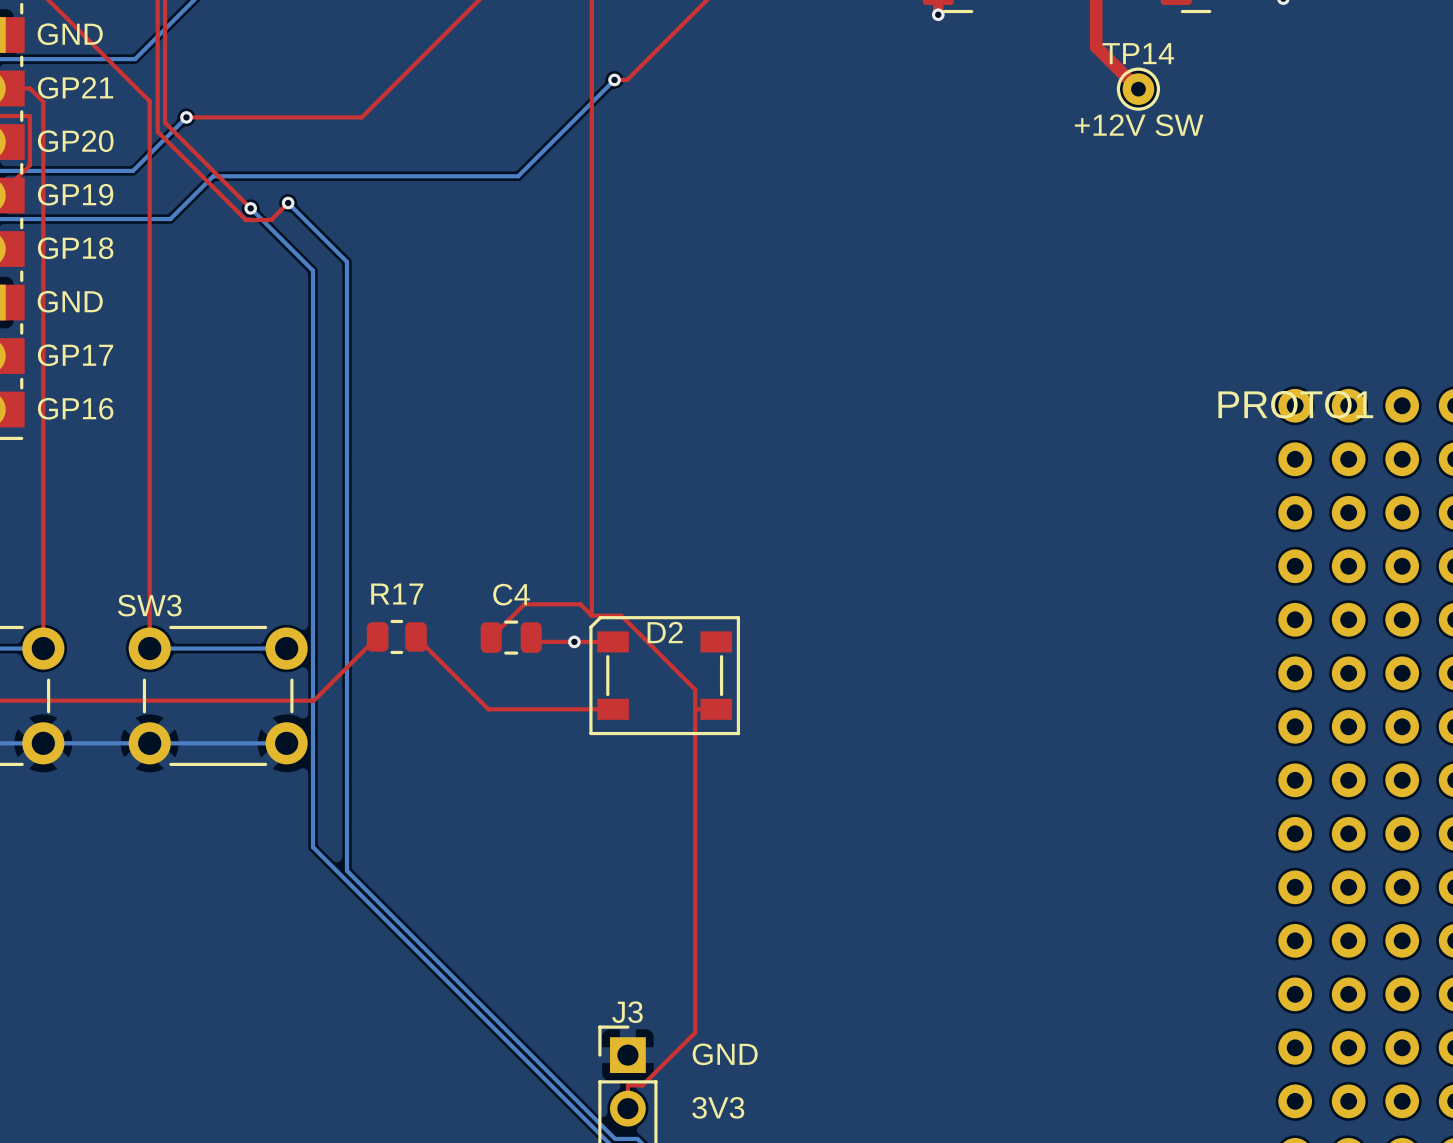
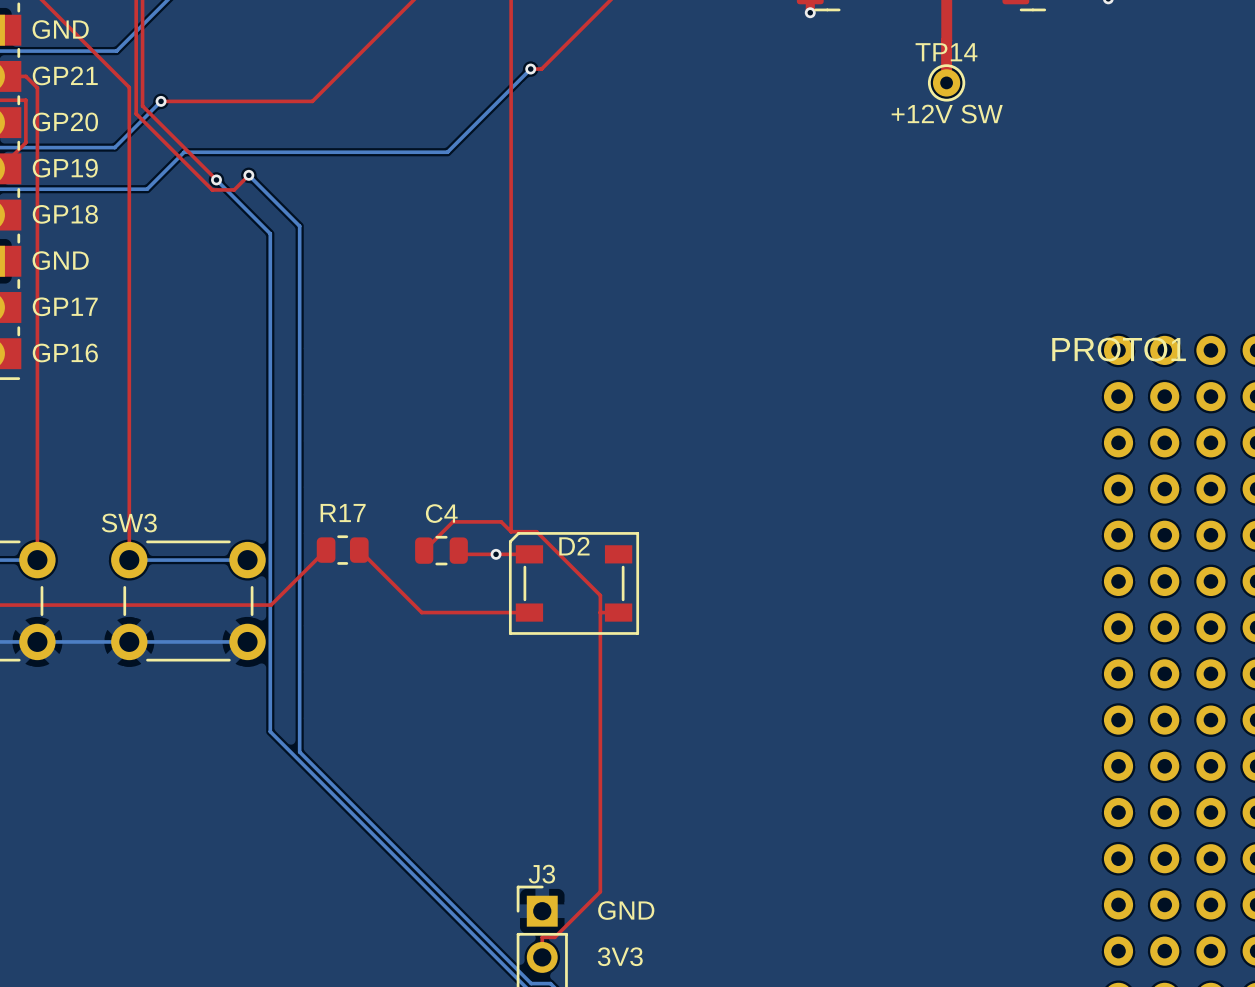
top track: (1096, 46) (1138, 89) -> (946, 40) (946, 82)
TP14 position: (1138, 89) -> (946, 82)

